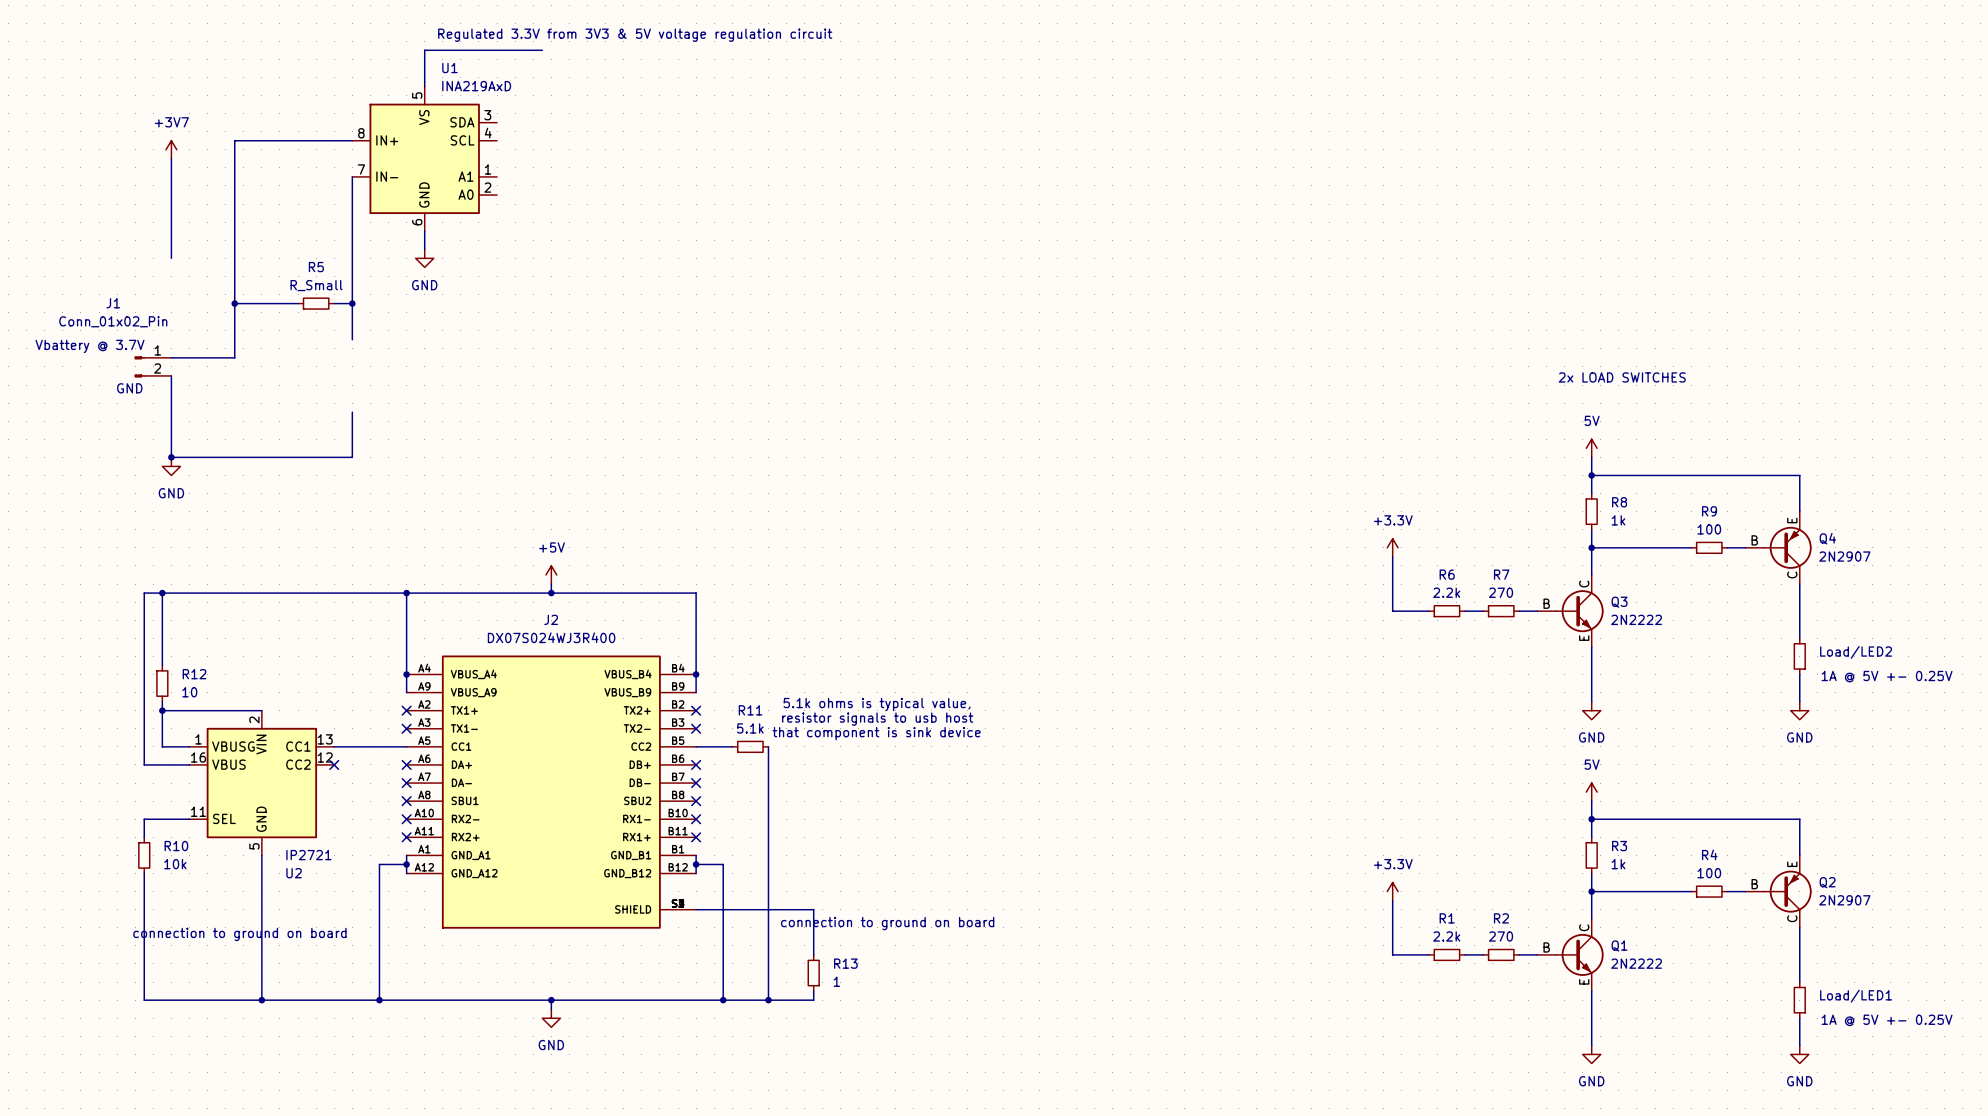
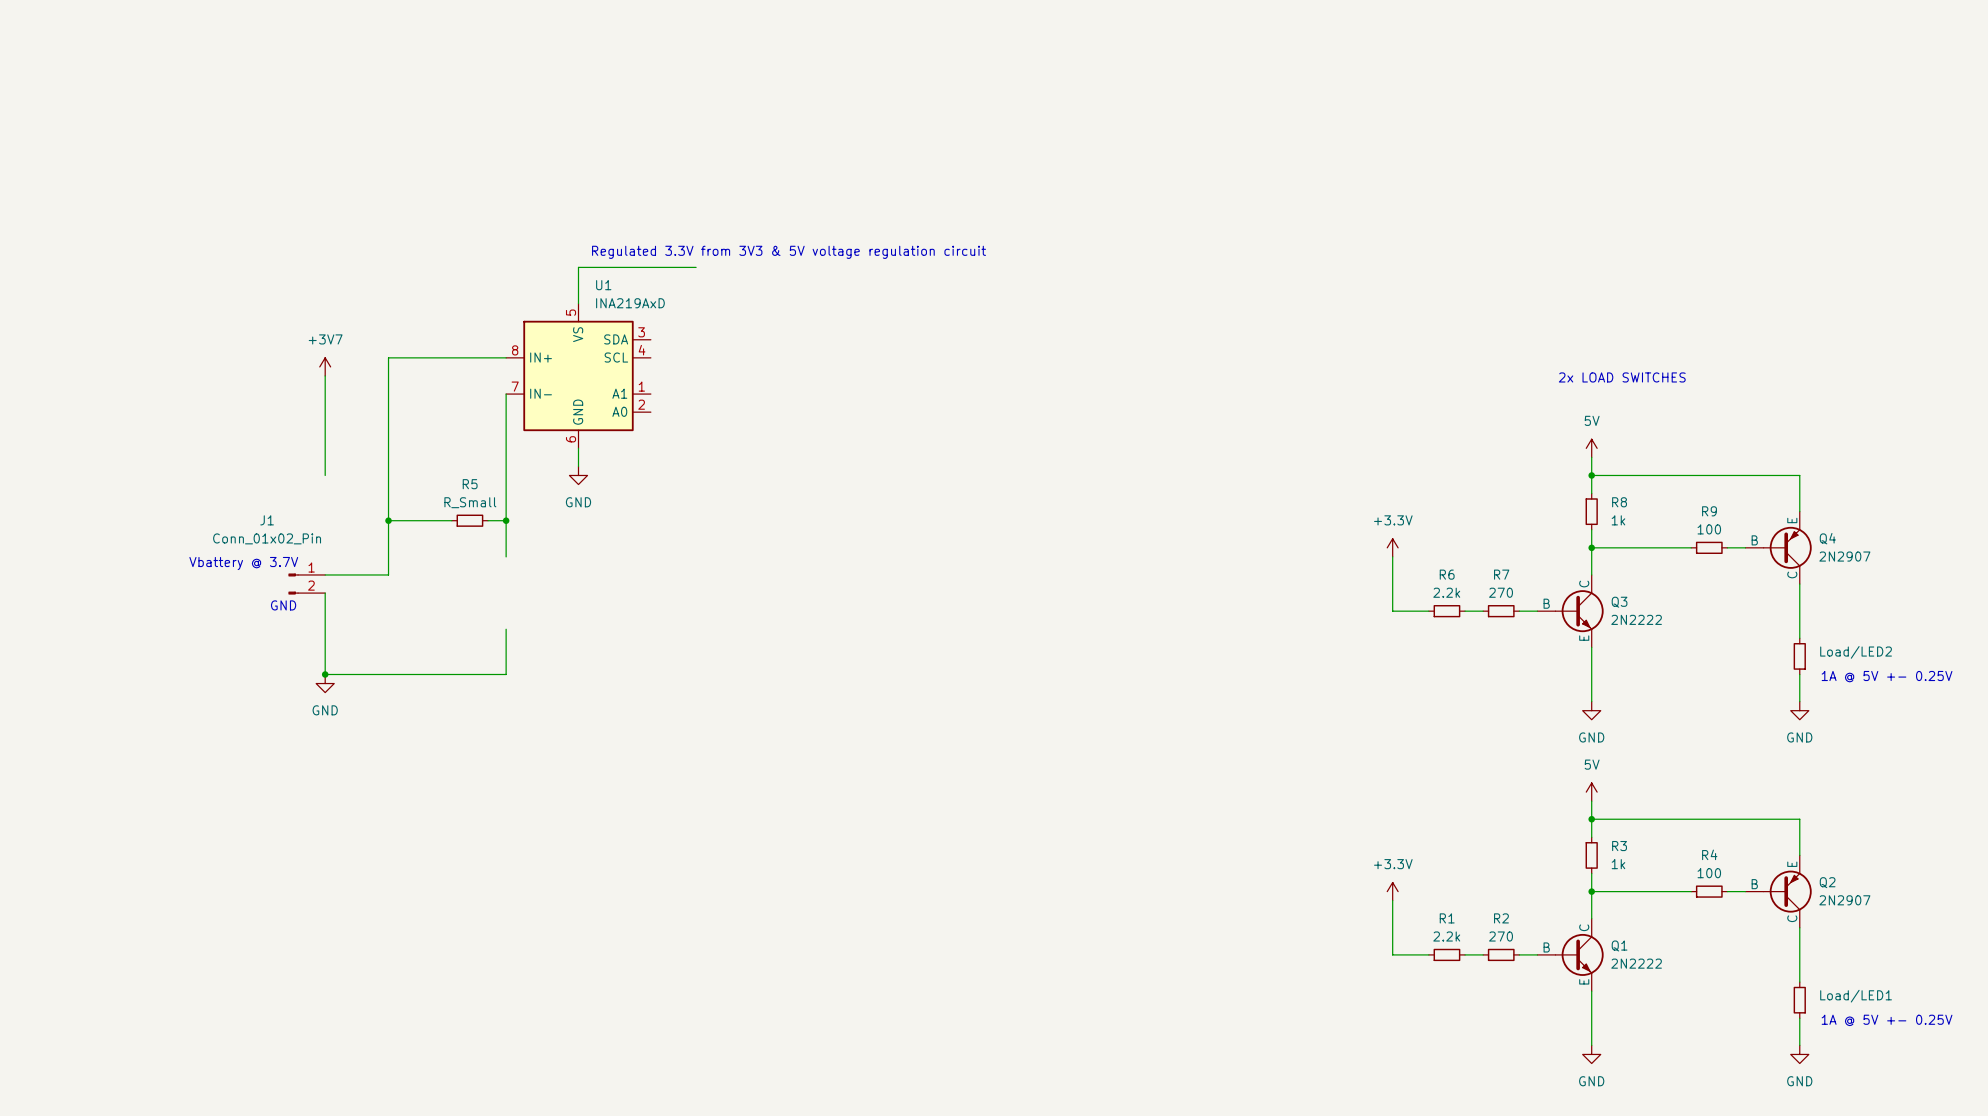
text: Regulated 3.3V from 3V3 & 5V voltage regulation circuit (635, 35) -> none
wire: (542, 50) (424, 50) (424, 86) -> none
wire: (352, 140) (234, 140) (234, 357) (171, 357) -> none
power symbol: +3V7 (171, 149) -> none
wire: (171, 158) (171, 258) -> none
U1 position: (424, 158) -> (578, 375)
wire: (352, 176) (352, 339) -> none
wire: (424, 231) (424, 249) -> none
text: none -> Regulated 3.3V from 3V3 & 5V voltage regulation circuit (789, 252)
power symbol: GND (424, 258) -> none
wire: none -> (696, 267) (578, 267) (578, 303)
wire: (234, 303) (298, 303) -> none
junction: (234, 303) -> none
R5 position: (316, 303) -> (469, 520)
wire: (334, 303) (352, 303) -> none
junction: (352, 303) -> none
text: Vbattery @ 3.7V (89, 346) -> none
wire: none -> (506, 357) (388, 357) (388, 574) (325, 574)
J1 position: (153, 366) -> (306, 584)
power symbol: none -> +3V7 (325, 366)
wire: (171, 375) (171, 457) (352, 457) (352, 412) -> none
wire: none -> (325, 375) (325, 475)
text: GND (129, 388) -> none
wire: none -> (506, 394) (506, 556)
wire: none -> (578, 448) (578, 466)
junction: (171, 457) -> none
power symbol: GND (171, 466) -> none
power symbol: none -> GND (578, 475)
wire: none -> (388, 520) (451, 520)
junction: none -> (388, 520)
wire: none -> (488, 520) (506, 520)
junction: none -> (506, 520)
text: none -> Vbattery @ 3.7V (243, 563)
power symbol: +5V (551, 574) -> none
wire: (551, 584) (551, 593) -> none
wire: (162, 593) (162, 665) -> none
junction: (162, 593) -> none
wire: none -> (325, 593) (325, 674) (506, 674) (506, 629)
wire: (406, 593) (406, 692) -> none
junction: (406, 593) -> none
junction: (551, 593) -> none
text: none -> GND (283, 605)
junction: none -> (325, 674)
junction: (406, 674) -> none
junction: (696, 674) -> none
R12: 10 (162, 683) -> none
power symbol: none -> GND (325, 683)
wire: (696, 692) (696, 593) (144, 593) (144, 764) (189, 764) -> none
wire: (162, 701) (162, 746) (189, 746) -> none
text: 5.1k ohms is typical value, (877, 704) -> none
wire: (162, 710) (261, 710) -> none
junction: (162, 710) -> none
no-connect mark: (406, 710) -> none
no-connect mark: (696, 710) -> none
text: resistor signals to usb host (877, 719) -> none
no-connect mark: (406, 728) -> none
no-connect mark: (696, 728) -> none
text: that component is sink device (876, 733) -> none
wire: (334, 746) (406, 746) -> none
wire: (696, 746) (732, 746) -> none
R11: 5.1k (750, 746) -> none
wire: (768, 746) (768, 1000) -> none
no-connect mark: (334, 764) -> none
no-connect mark: (406, 764) -> none
no-connect mark: (696, 764) -> none
U2: IP2721 (261, 783) -> none
no-connect mark: (406, 783) -> none
no-connect mark: (696, 783) -> none
J2: DX07S024WJ3R400 (551, 792) -> none
no-connect mark: (406, 801) -> none
no-connect mark: (696, 801) -> none
wire: (189, 819) (144, 819) (144, 837) -> none
no-connect mark: (406, 819) -> none
no-connect mark: (696, 819) -> none
no-connect mark: (406, 837) -> none
no-connect mark: (696, 837) -> none
R10: 10k (144, 855) -> none
wire: (261, 855) (261, 1000) -> none
wire: (406, 855) (406, 873) -> none
wire: (696, 855) (696, 873) -> none
wire: (406, 864) (379, 864) (379, 1000) -> none
junction: (406, 864) -> none
wire: (696, 864) (723, 864) (723, 1000) -> none
junction: (696, 864) -> none
wire: (144, 873) (144, 1000) (813, 1000) (813, 991) -> none
wire: (696, 909) (813, 909) (813, 954) -> none
text: connection to ground on board (887, 923) -> none
text: connection to ground on board (239, 934) -> none
R13: 1 (813, 973) -> none
junction: (261, 1000) -> none
junction: (379, 1000) -> none
wire: (551, 1000) (551, 1009) -> none
junction: (551, 1000) -> none
junction: (723, 1000) -> none
junction: (768, 1000) -> none
power symbol: GND (551, 1018) -> none

